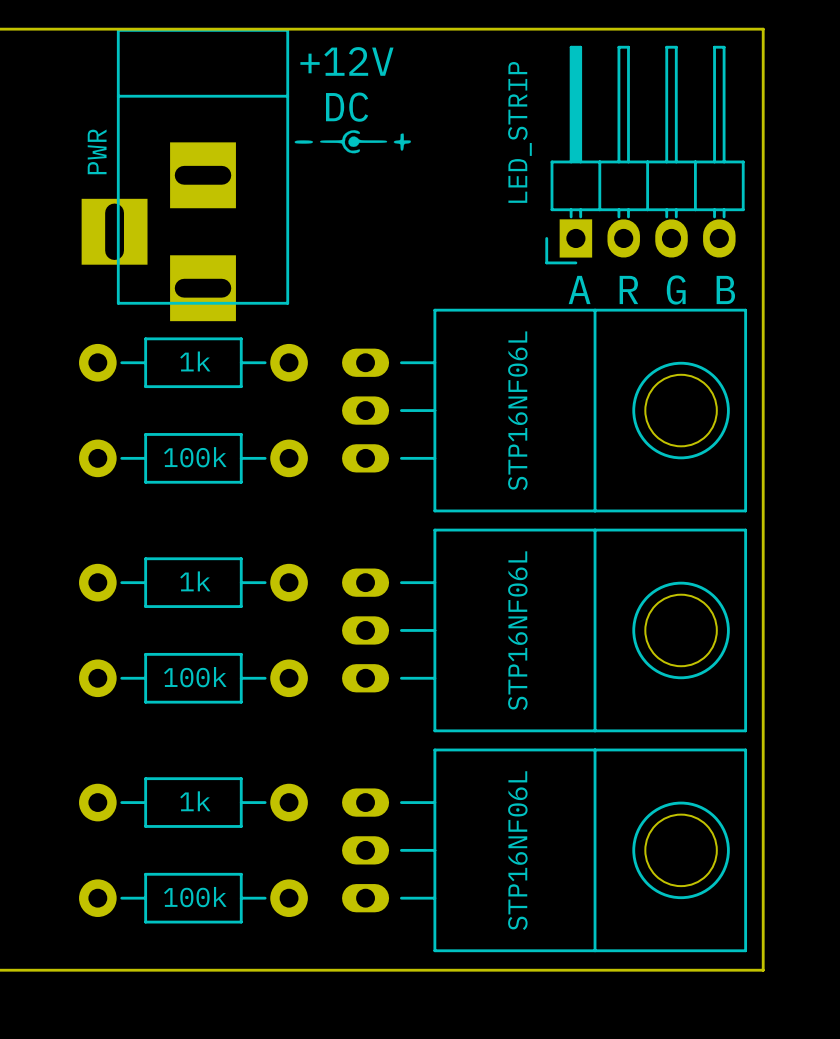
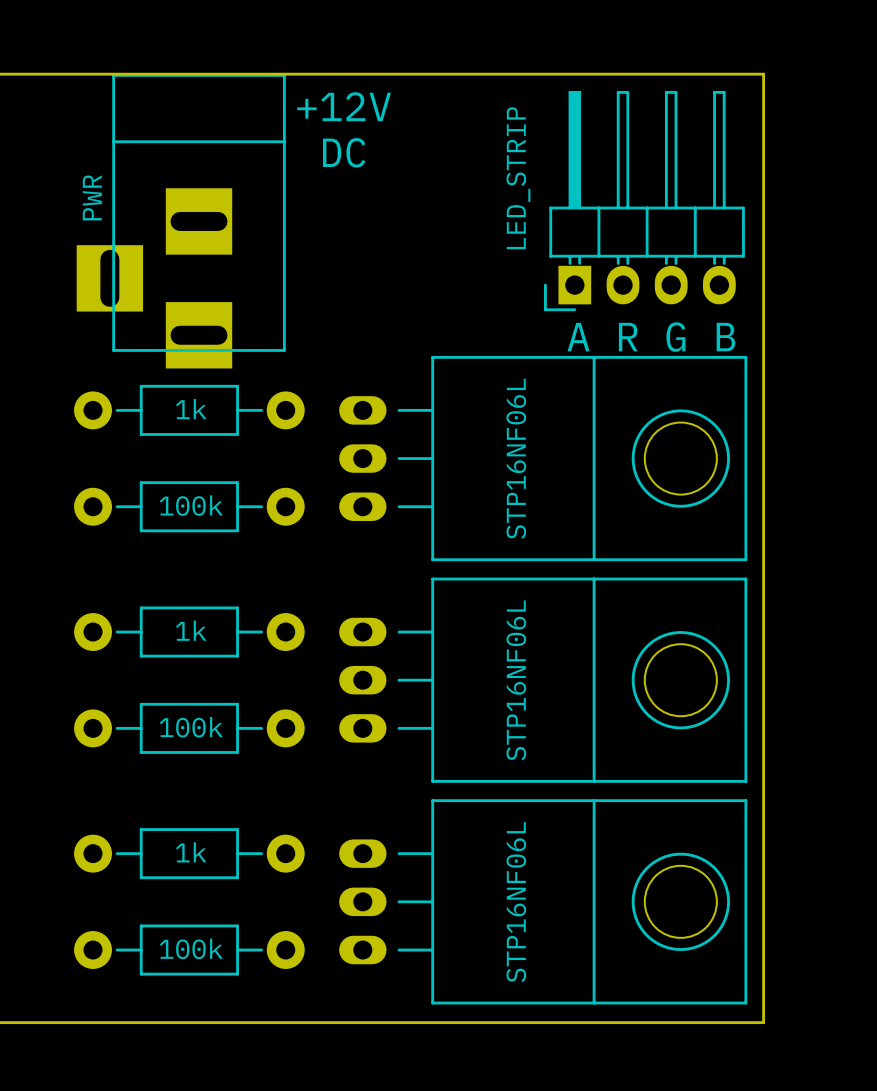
drawing: [294, 130, 411, 154] -> none

